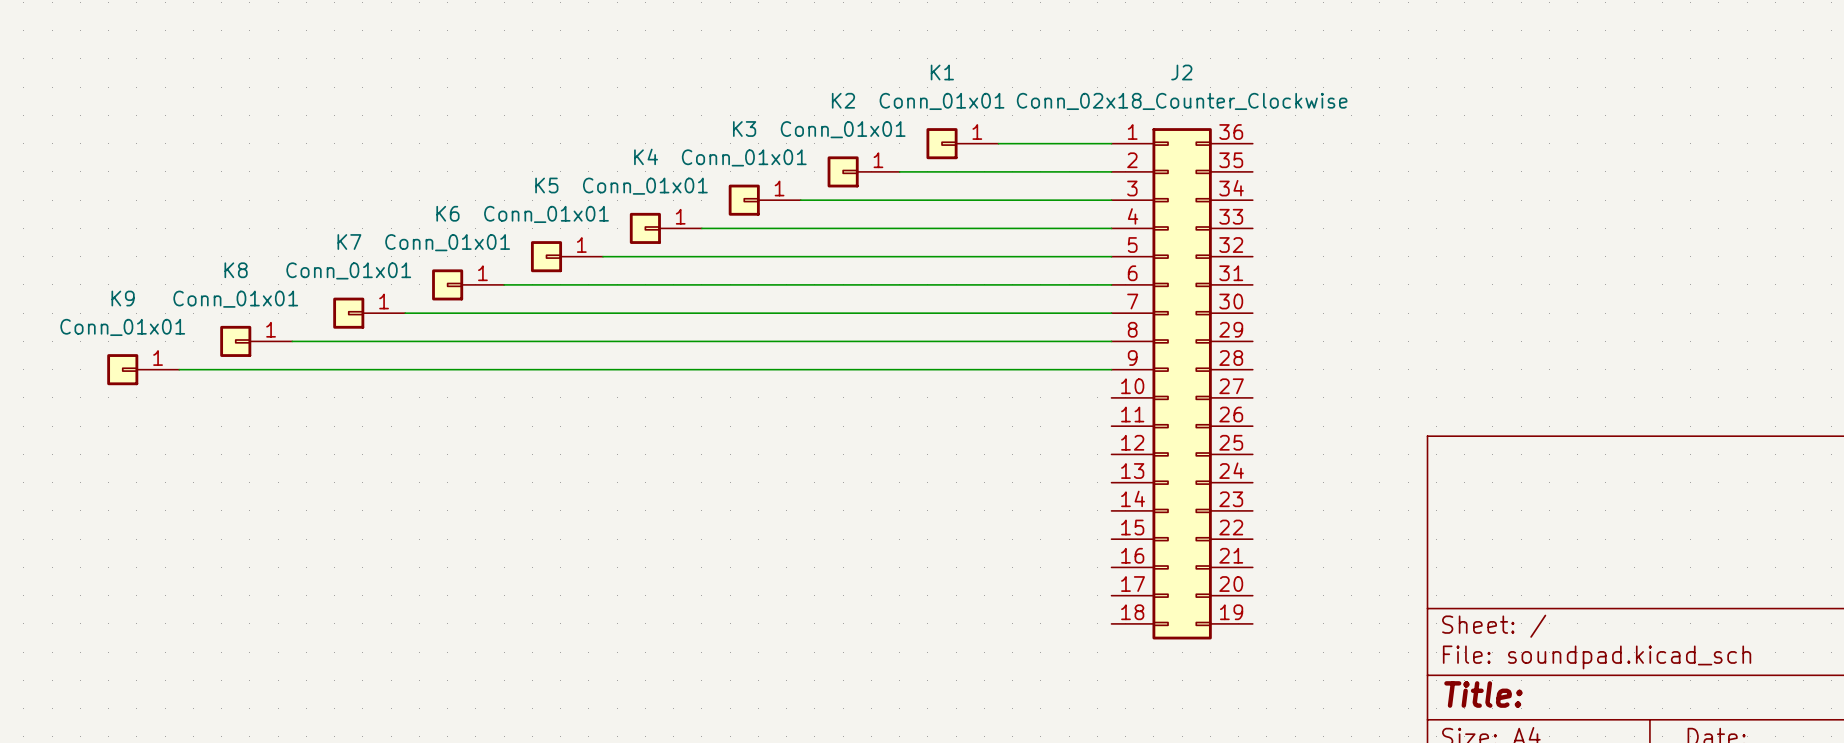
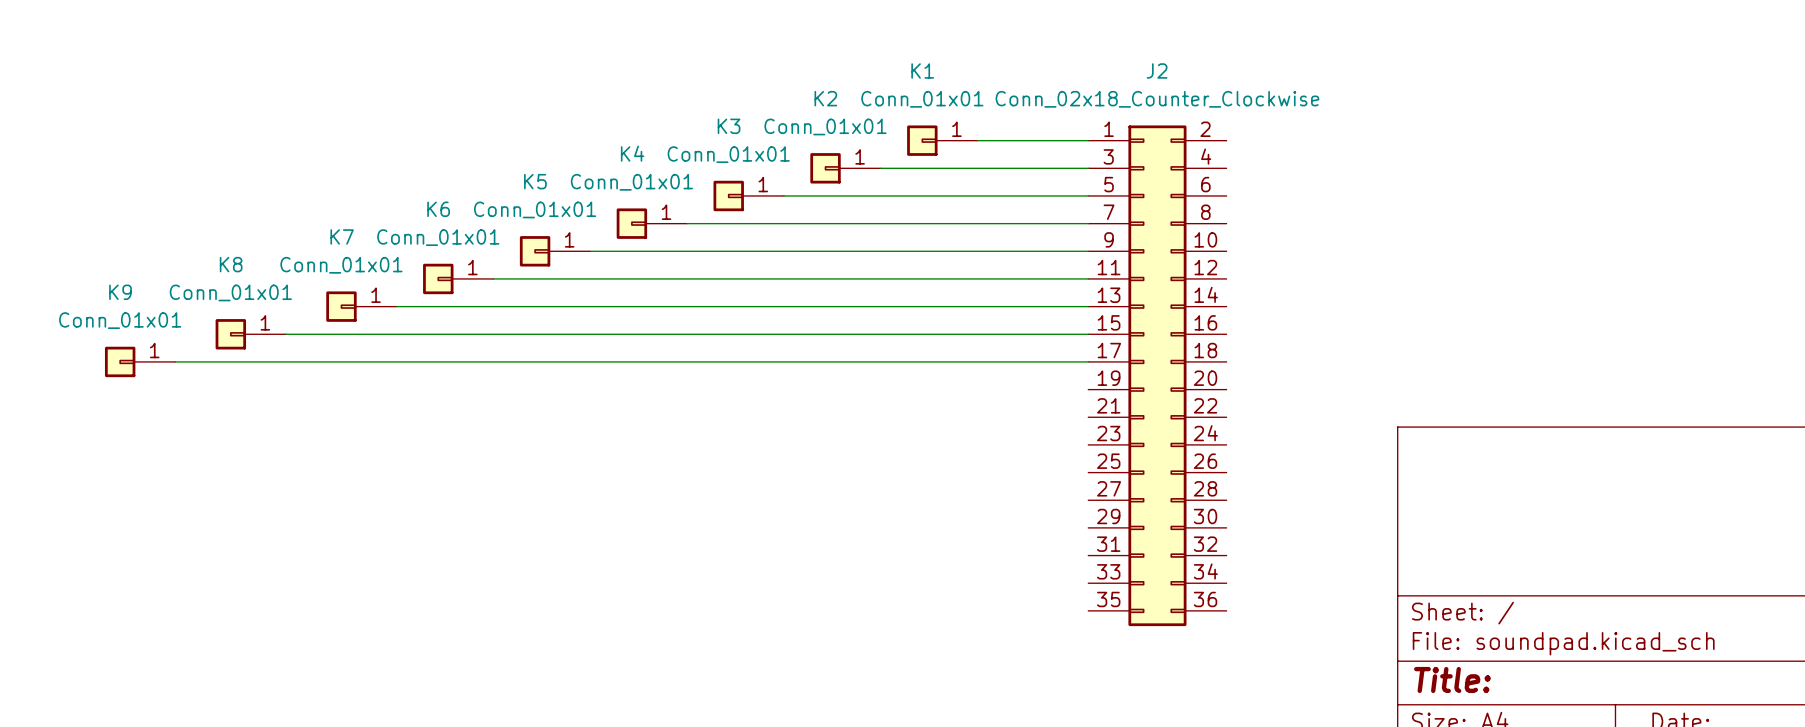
J2 symbol: [1111, 128, 1253, 640] -> [1088, 125, 1227, 627]

